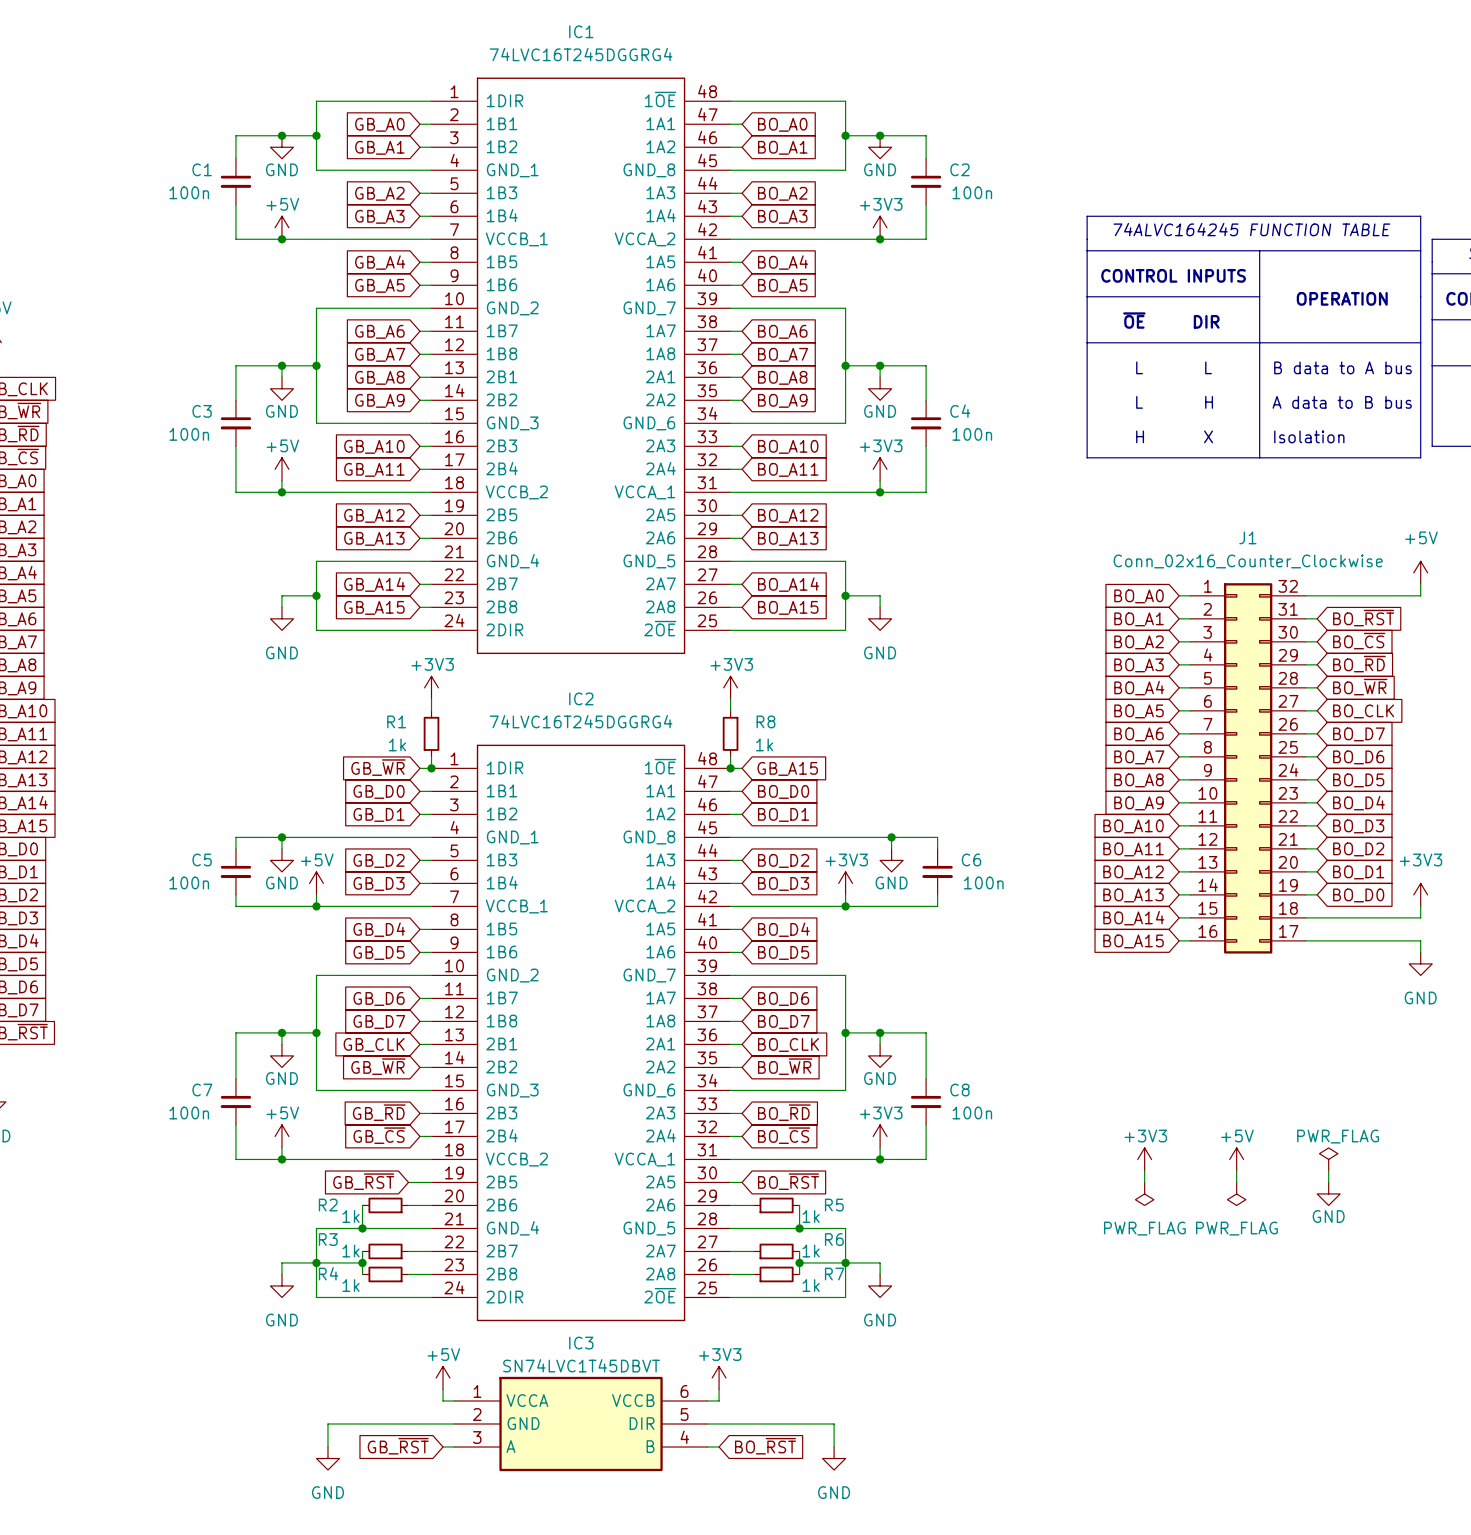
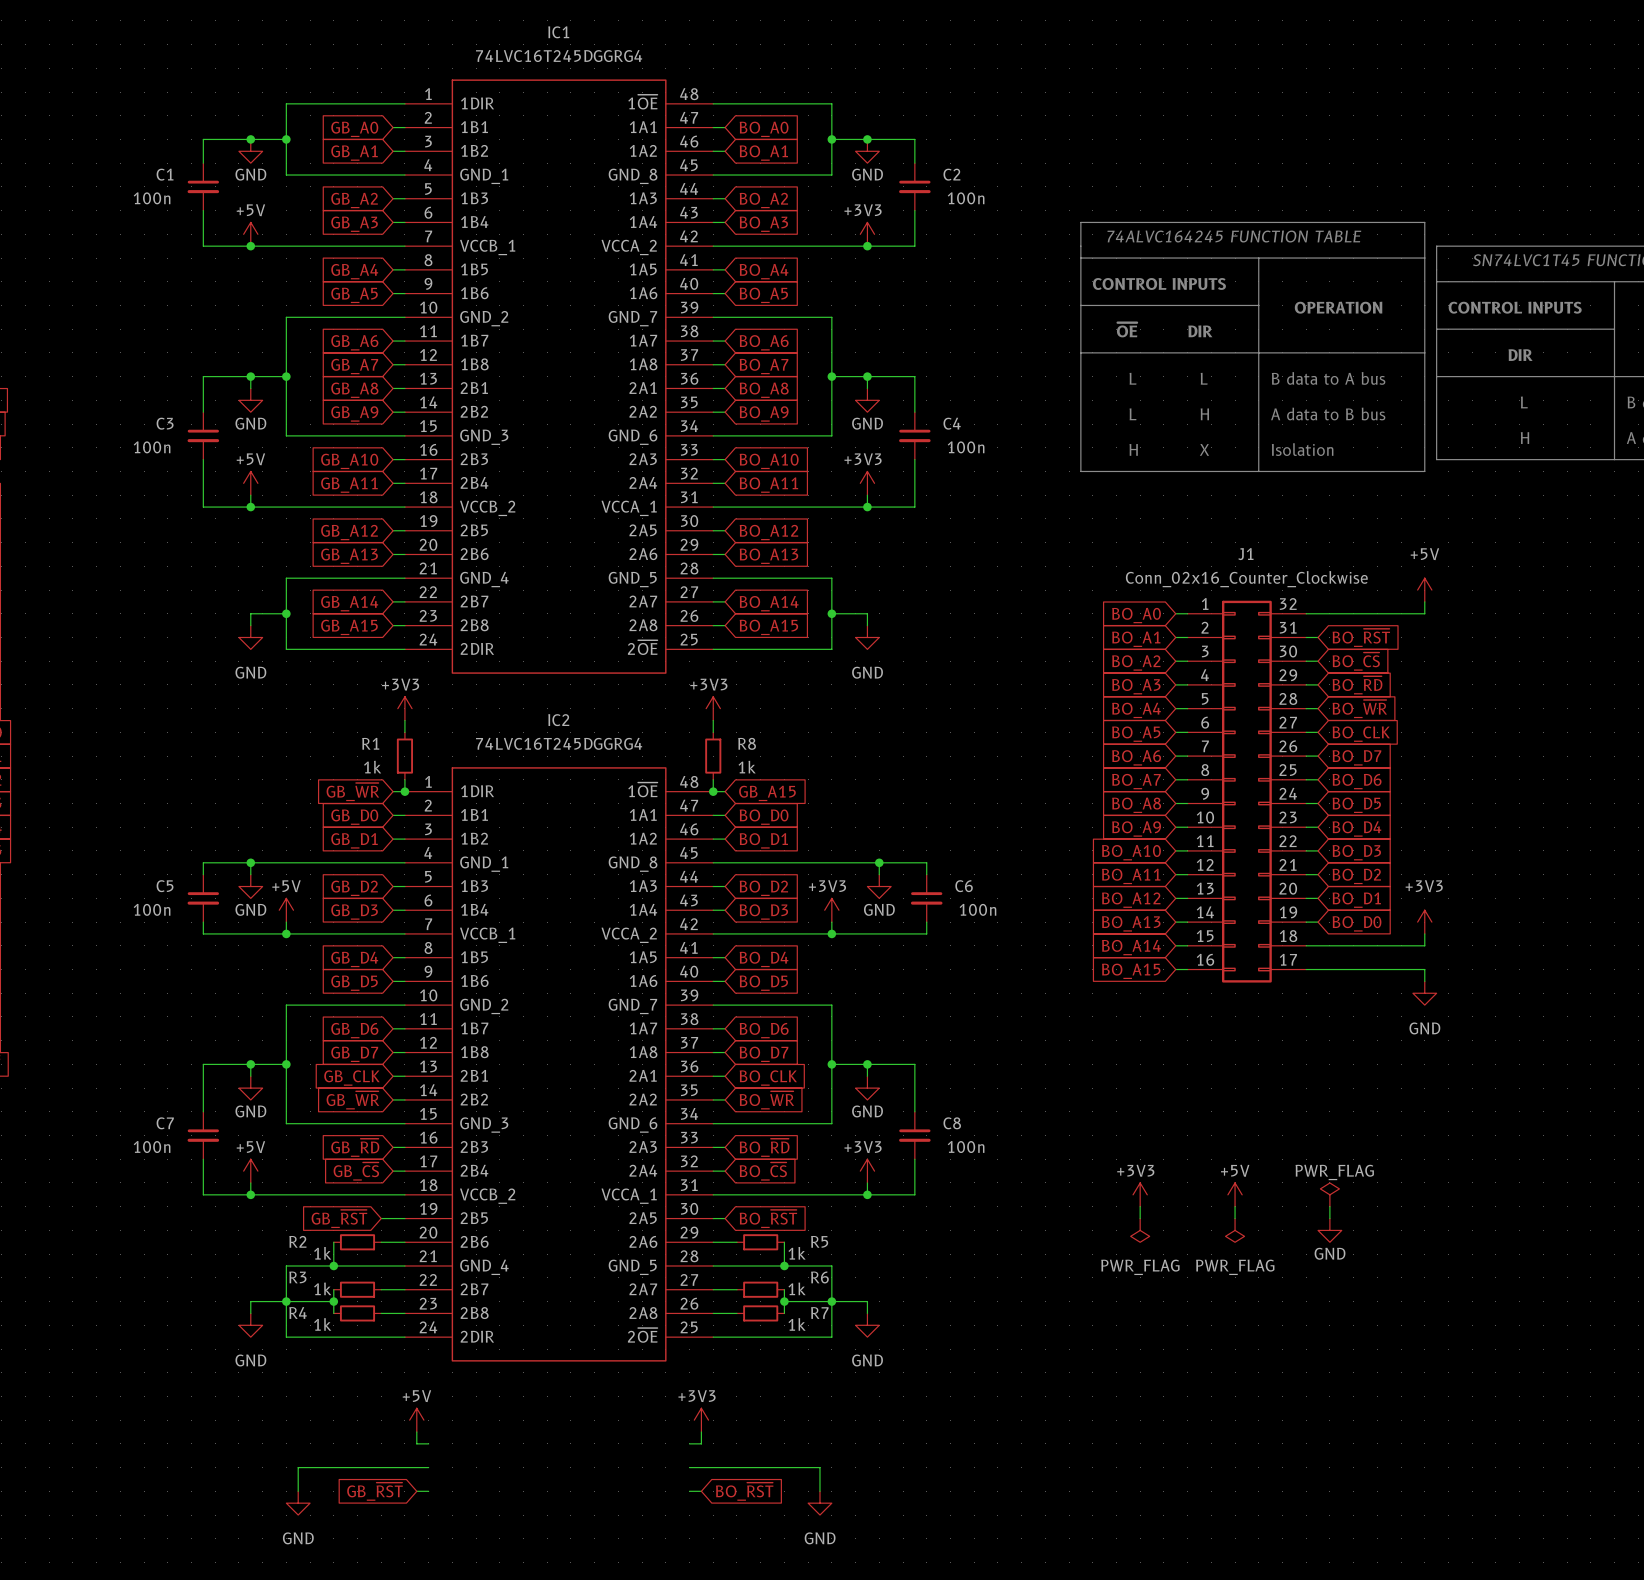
IC3: SN74LVC1T45DBVT (581, 1424) -> none

